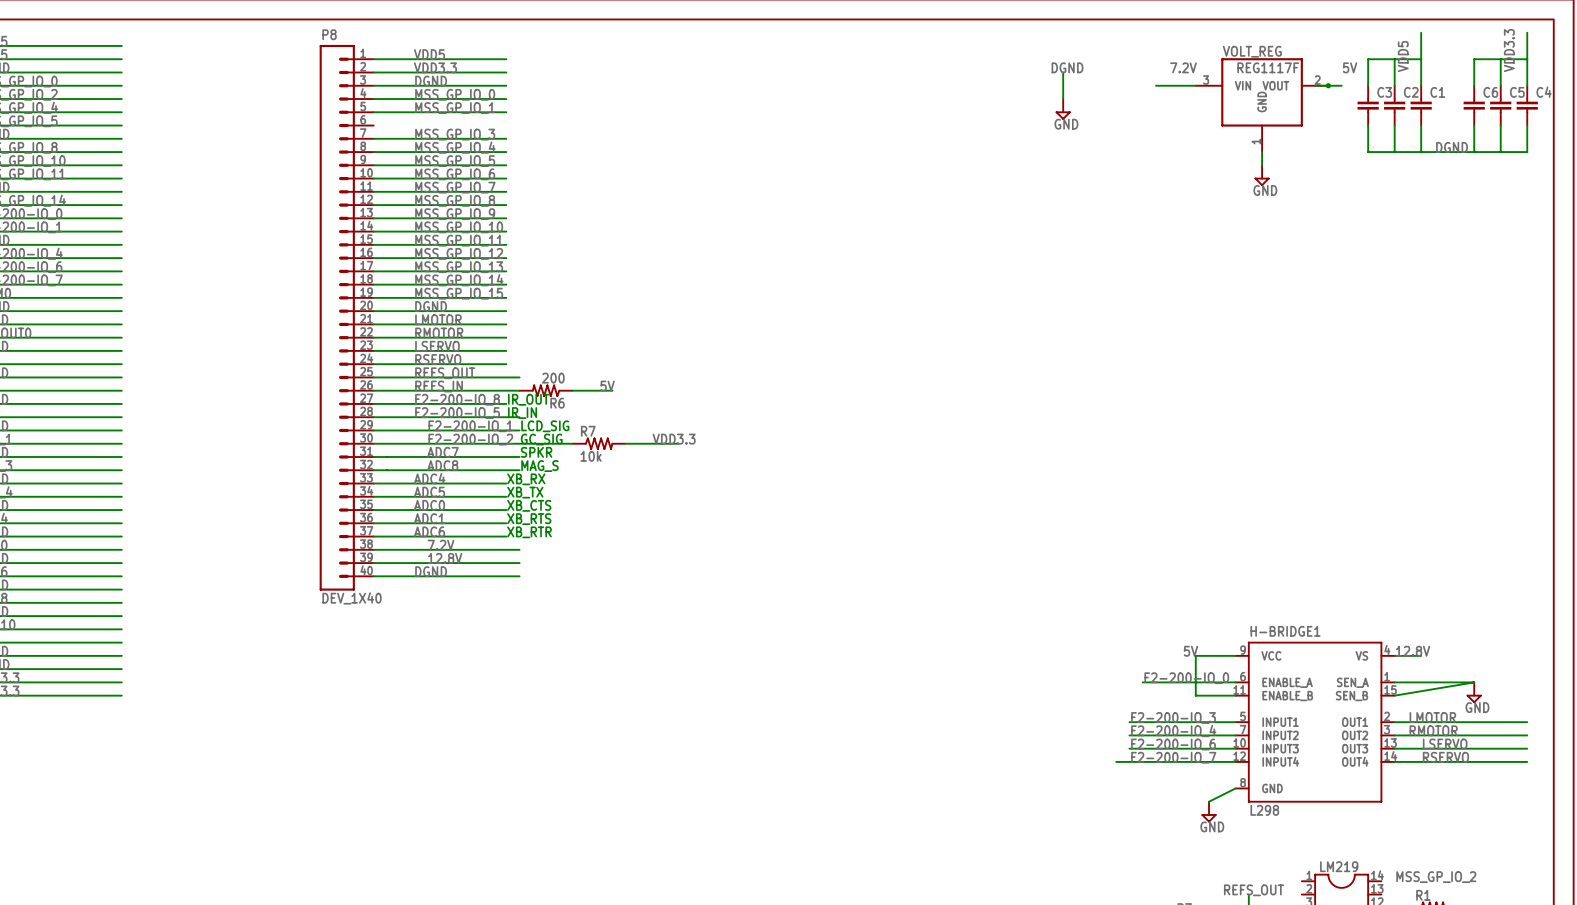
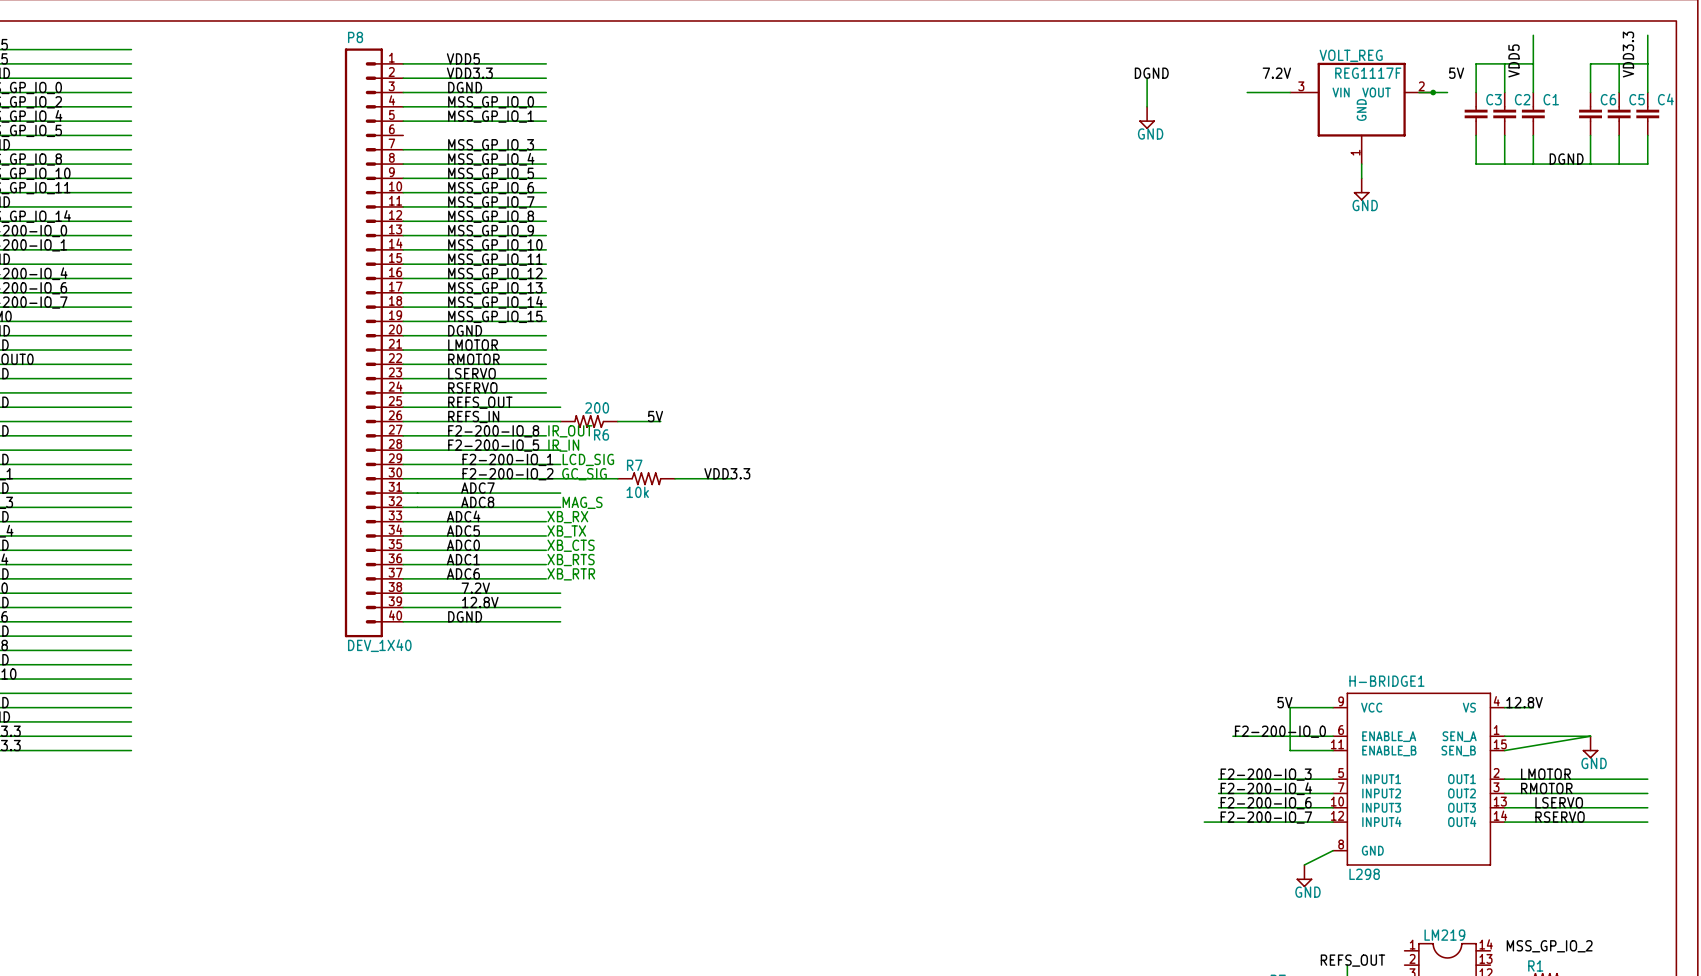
text: SPKR (536, 452) -> none

